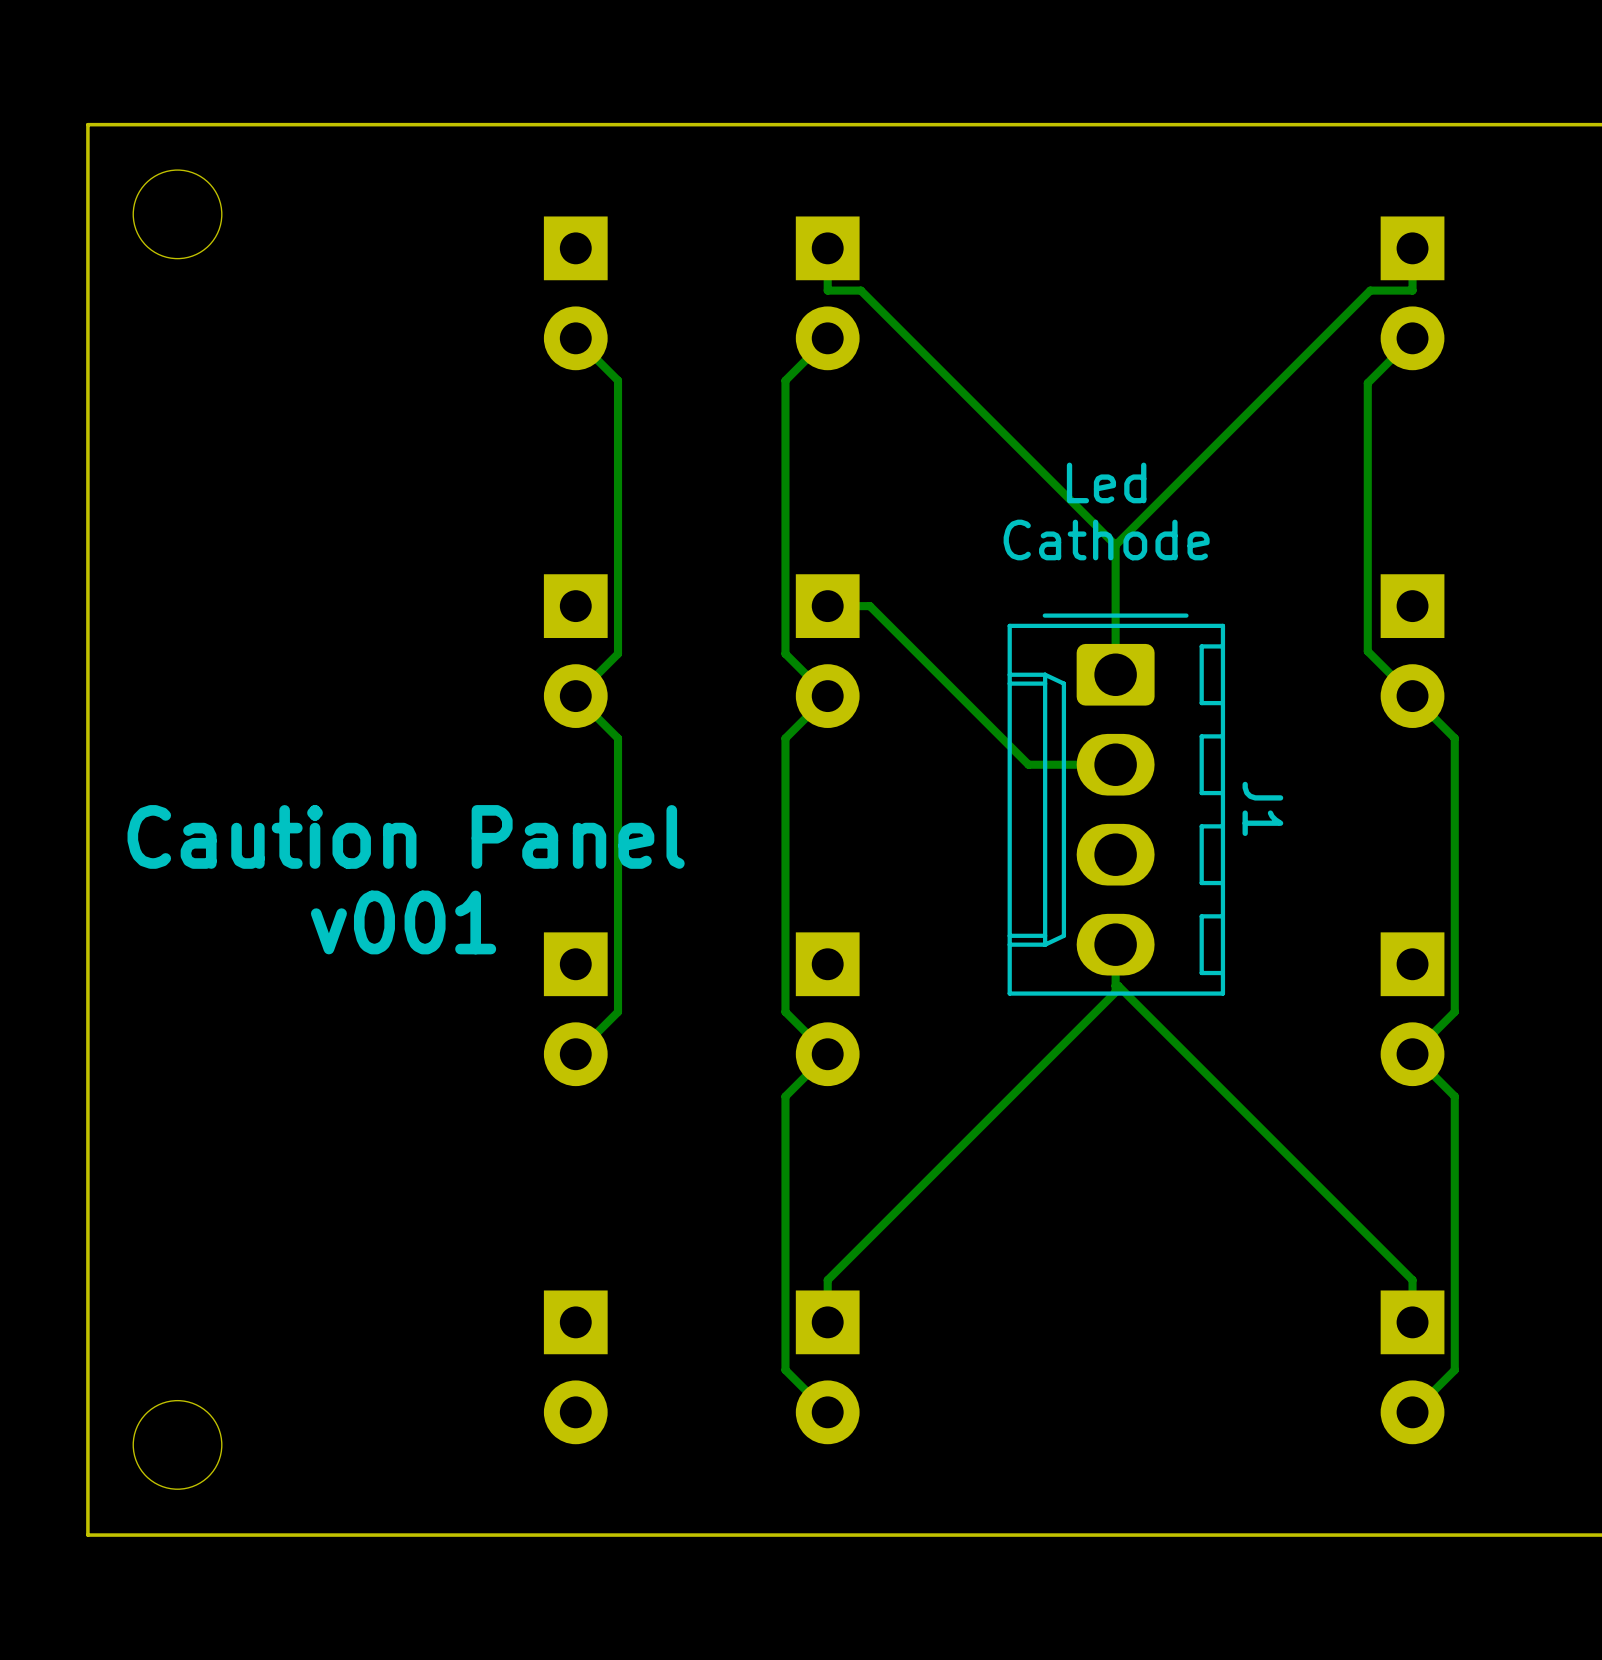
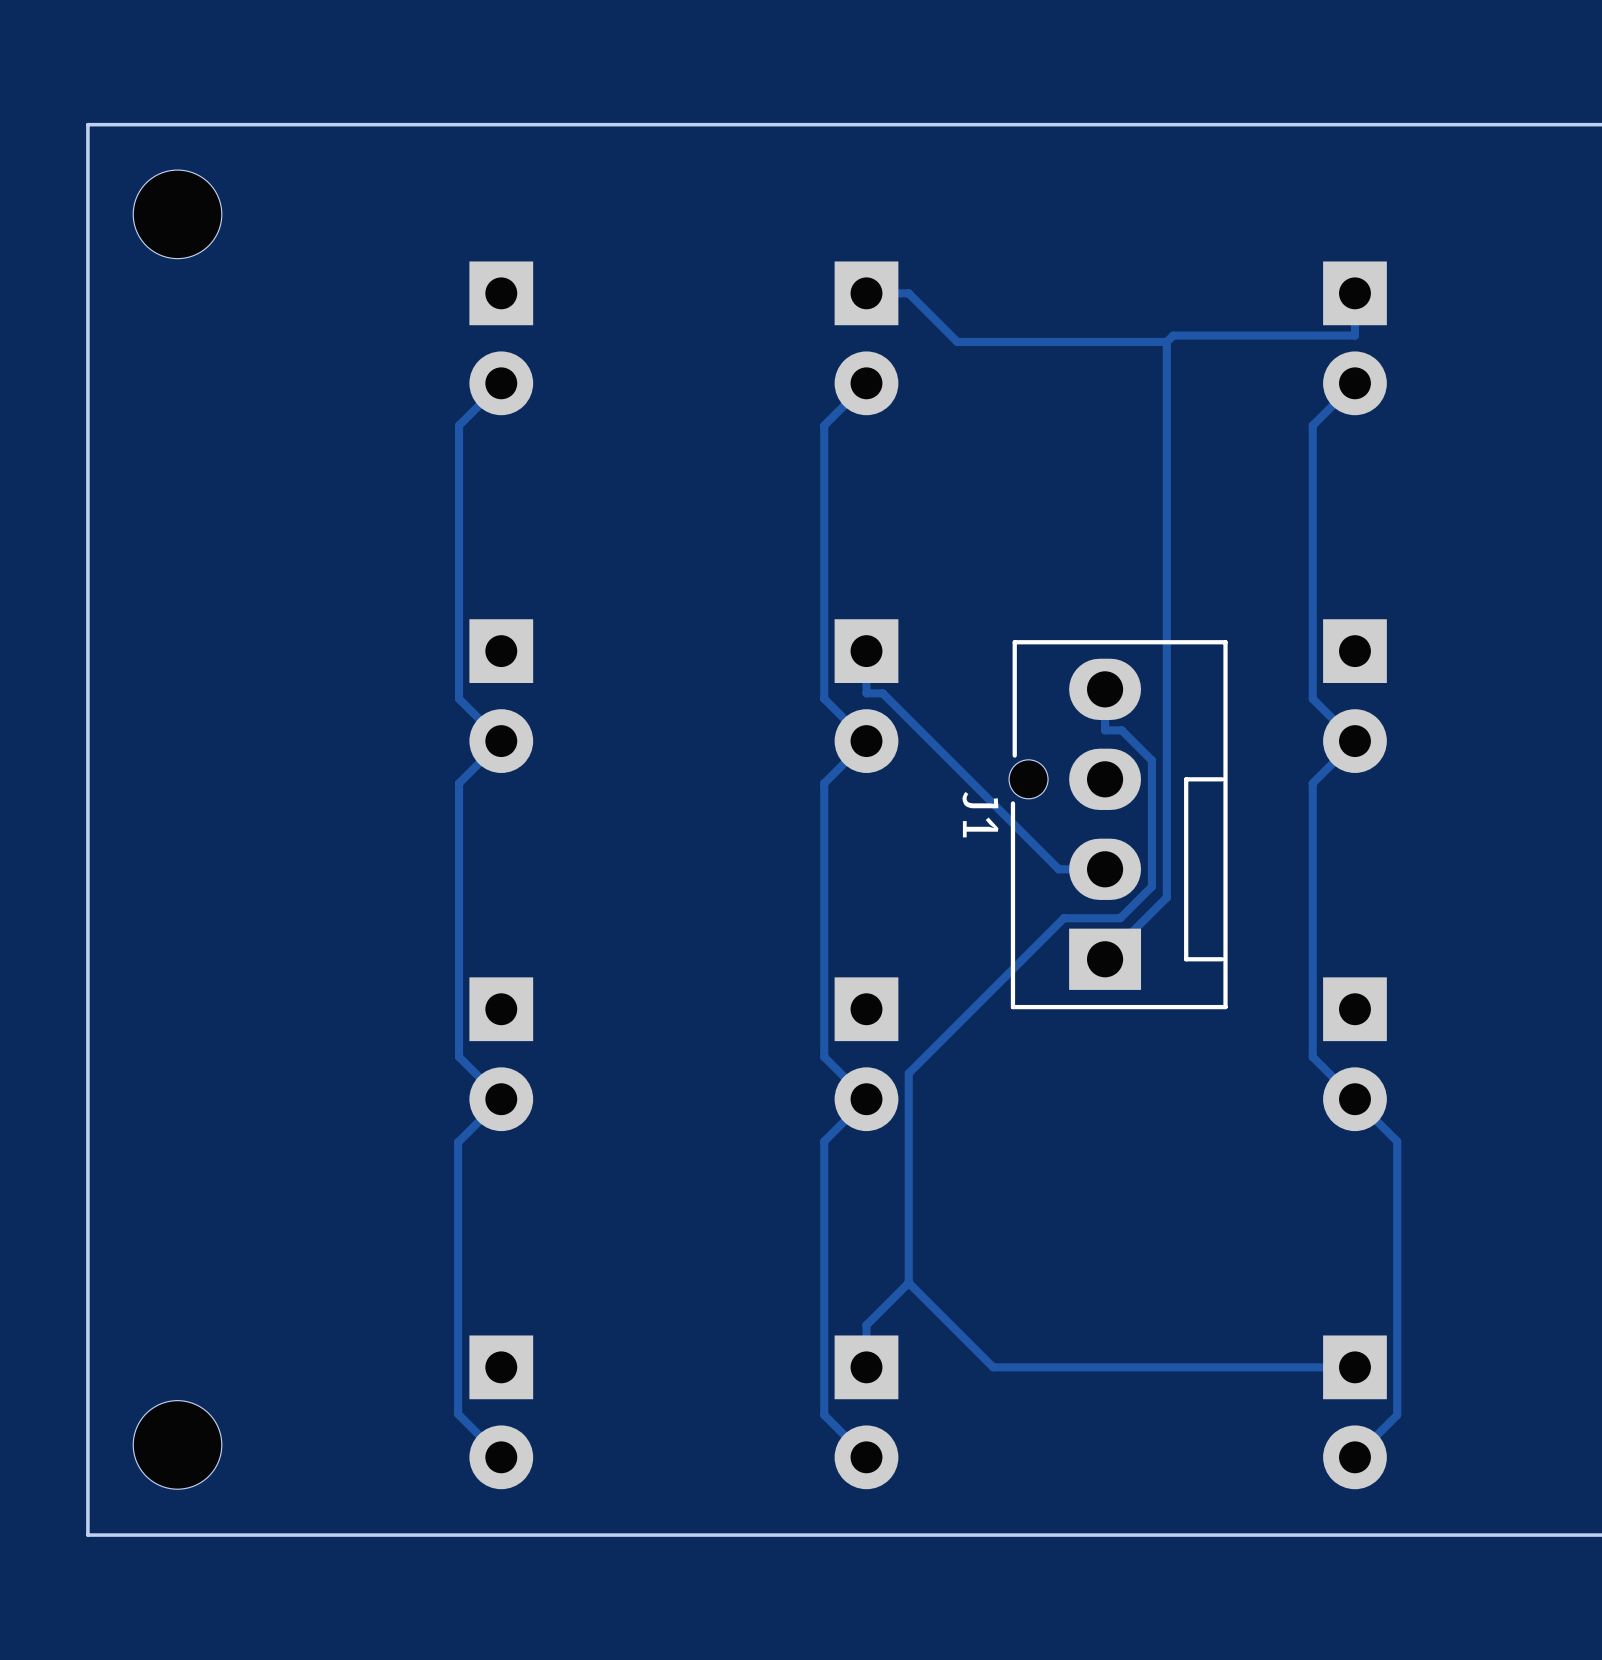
track: (827, 248) (827, 290) (860, 290) (1115, 545) -> none
track: (1412, 248) (1412, 290) (1370, 290) (1115, 545) -> none
part position: (575, 293) -> (501, 338)
part position: (827, 293) -> (866, 338)
track: none -> (866, 293) (908, 293) (957, 341) (1166, 341)
track: none -> (1354, 293) (1354, 335) (1173, 335) (1166, 341)
part position: (1412, 293) -> (1354, 338)
track: (575, 338) (618, 380) (618, 653) (575, 696) (618, 738) (618, 1011) (575, 1054) -> none
track: (827, 338) (785, 380) (785, 653) (827, 696) (785, 738) (785, 1011) (827, 1054) (785, 1096) (785, 1370) (827, 1412) -> (866, 383) (824, 425) (824, 698) (866, 741) (824, 783) (824, 1056) (866, 1099) (824, 1141) (824, 1415) (866, 1457)
track: (1412, 338) (1367, 383) (1367, 651) (1454, 738) (1454, 1011) (1412, 1054) (1454, 1096) (1454, 1370) (1412, 1412) -> none
track: none -> (1166, 341) (1166, 897) (1105, 959)
track: none -> (501, 383) (459, 425) (459, 698) (501, 741) (459, 783) (459, 1056) (501, 1099) (458, 1142) (458, 1414) (501, 1457)
track: none -> (1354, 383) (1312, 425) (1312, 698) (1354, 741) (1312, 783) (1312, 1056) (1397, 1141) (1397, 1415) (1354, 1457)
text: Led (1106, 482) -> none
text: Cathode (1106, 540) -> none
track: (1115, 545) (1115, 674) -> none
track: (827, 606) (869, 606) (1028, 764) (1115, 764) -> none
J1 footprint: [1007, 613, 1226, 996] -> [1009, 640, 1228, 1010]
part position: (575, 651) -> (501, 696)
part position: (827, 651) -> (866, 696)
track: none -> (866, 651) (866, 693) (882, 693) (1058, 869) (1105, 869)
part position: (1412, 651) -> (1354, 696)
track: none -> (1105, 689) (1105, 730) (1121, 730) (1151, 760) (1151, 886) (1120, 918) (1063, 918) (908, 1073) (908, 1282)
J1 name position: J1 (1262, 808) -> J1 (980, 814)
text: Caution Panel (406, 836) -> none
text: v001 (403, 922) -> none
track: (1115, 944) (1115, 992) (827, 1280) (827, 1322) -> none
track: (1115, 985) (1118, 985) (1412, 1280) (1412, 1322) -> none
part position: (575, 1009) -> (501, 1054)
part position: (827, 1009) -> (866, 1054)
part position: (1412, 1009) -> (1354, 1054)
track: none -> (908, 1282) (866, 1325) (866, 1367)
track: none -> (908, 1282) (993, 1367) (1354, 1367)
part position: (575, 1367) -> (501, 1412)
part position: (827, 1367) -> (866, 1412)
part position: (1412, 1367) -> (1354, 1412)

